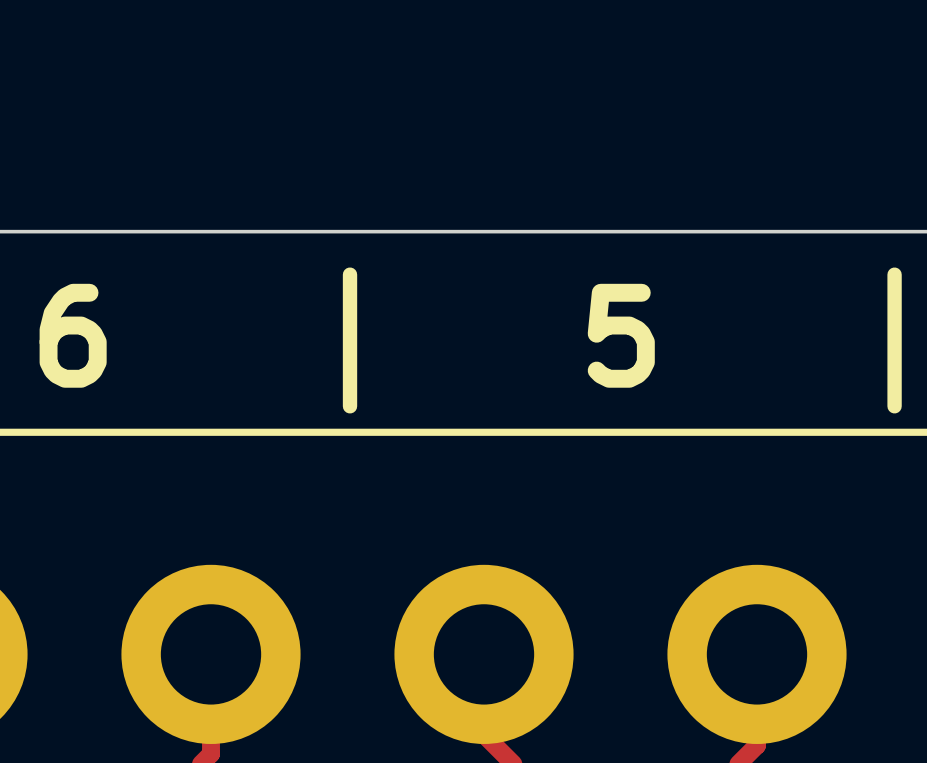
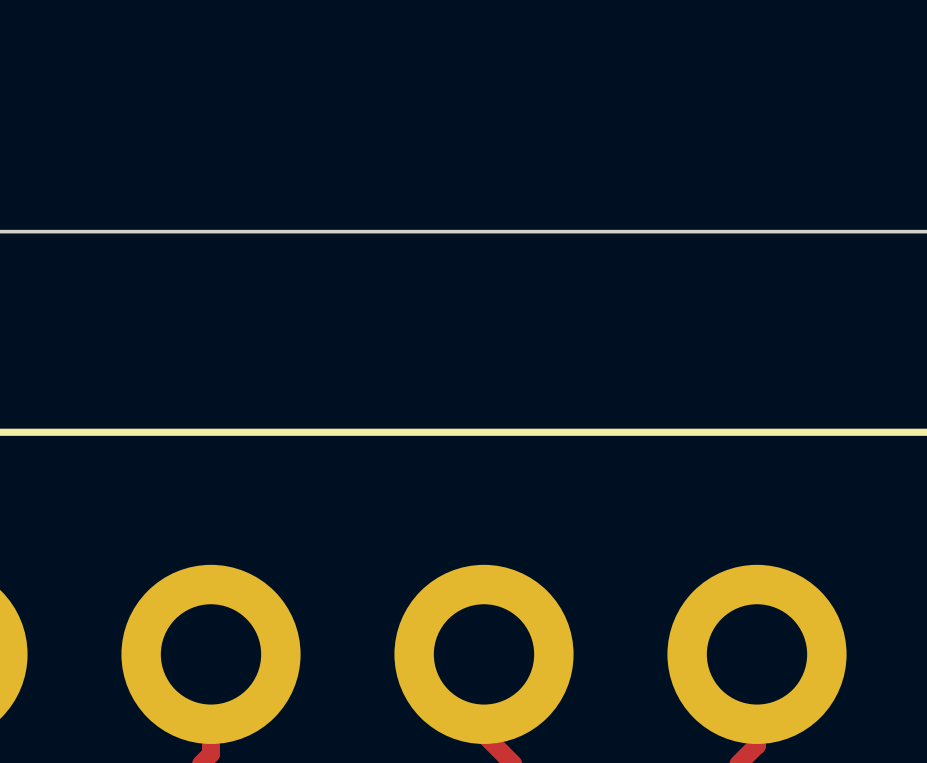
line: (350, 274) (350, 406) -> none
line: (894, 274) (894, 406) -> none
text: 6 (73, 335) -> none
text: 5 (621, 335) -> none

